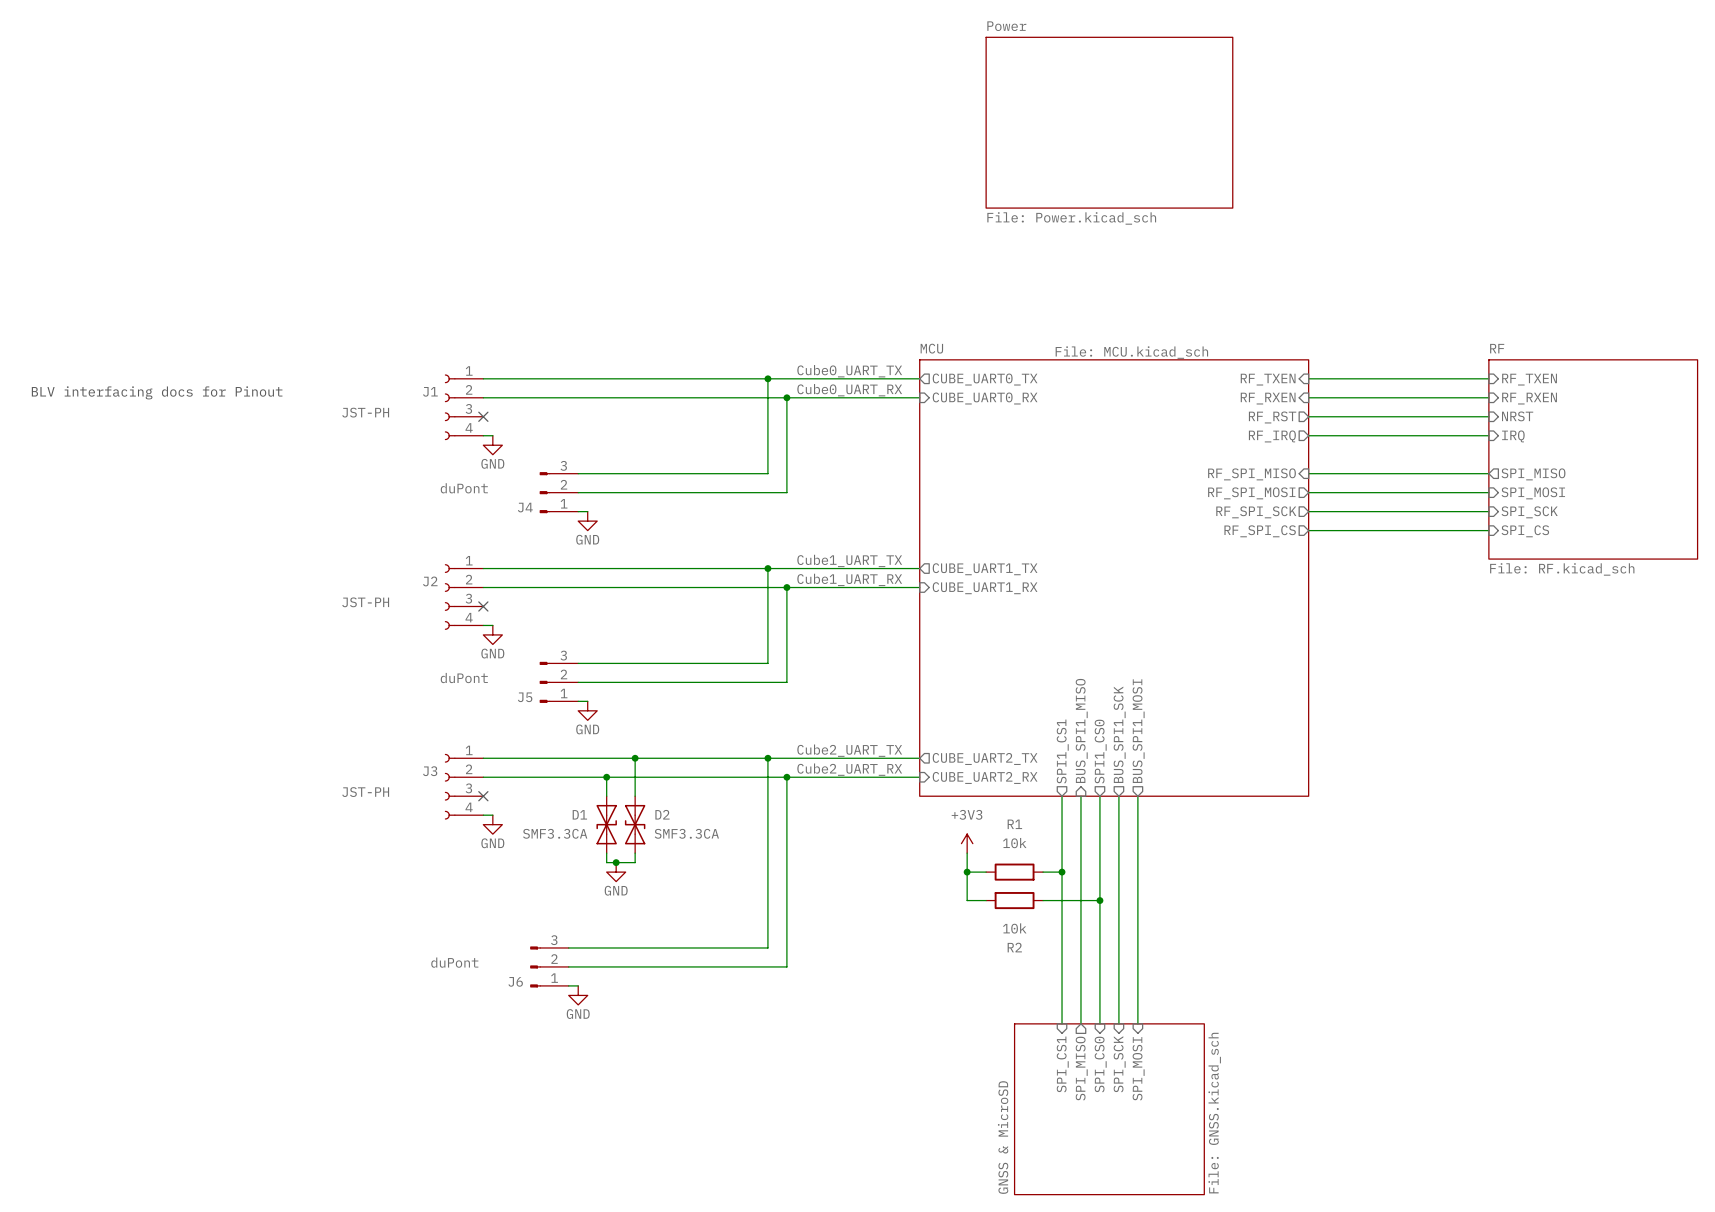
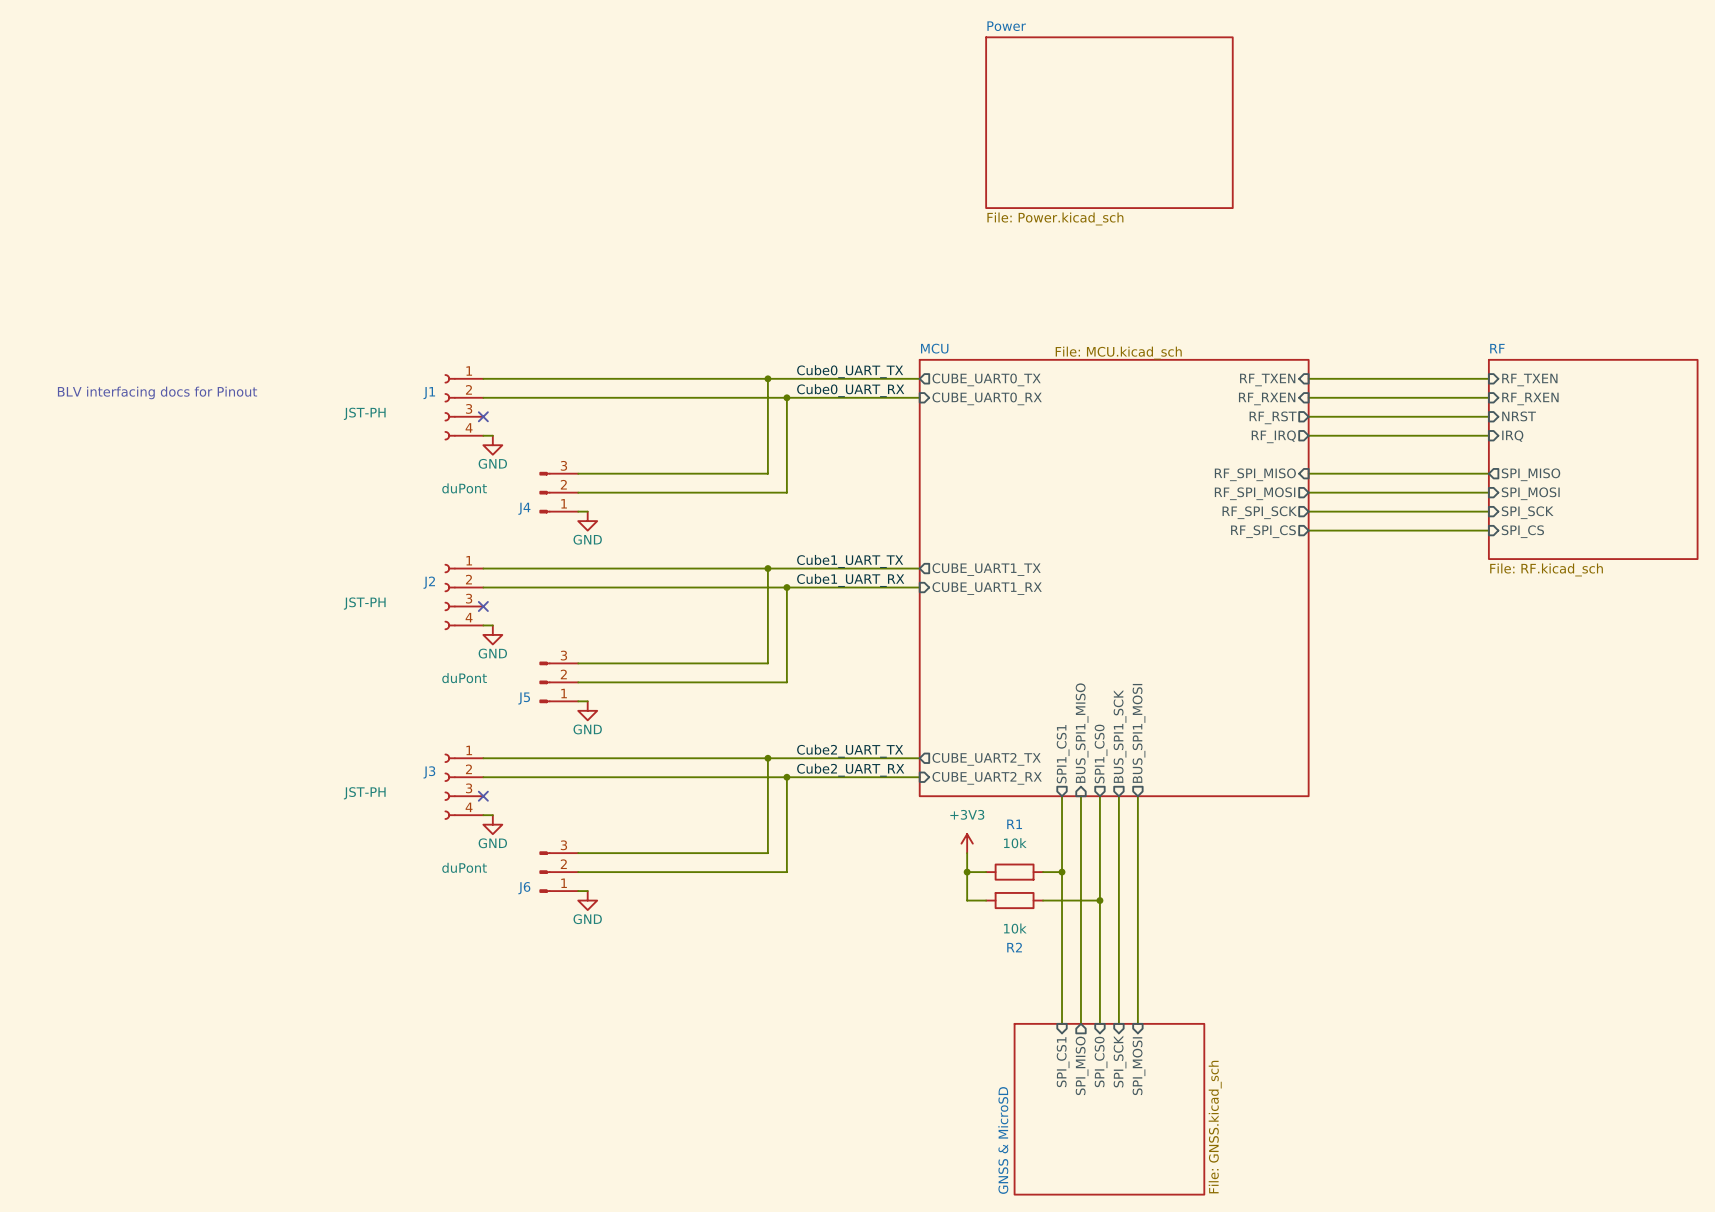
wire: (635, 758) (635, 796) -> none
junction: (635, 758) -> none
wire: (606, 777) (606, 796) -> none
junction: (606, 777) -> none
D1: SMF3.3CA (606, 824) -> none
D2: SMF3.3CA (635, 824) -> none
wire: (606, 853) (606, 862) (635, 862) (635, 853) -> none
wire: (767, 853) (767, 947) (568, 947) -> (767, 853) (578, 853)
junction: (616, 862) -> none
power symbol position: GND (616, 872) -> GND (587, 900)
wire: (786, 872) (786, 966) (568, 966) -> (786, 872) (578, 872)
J6 position: (549, 966) -> (558, 872)
wire: (568, 985) (578, 985) -> (578, 891) (587, 891)
power symbol: GND (578, 995) -> none

